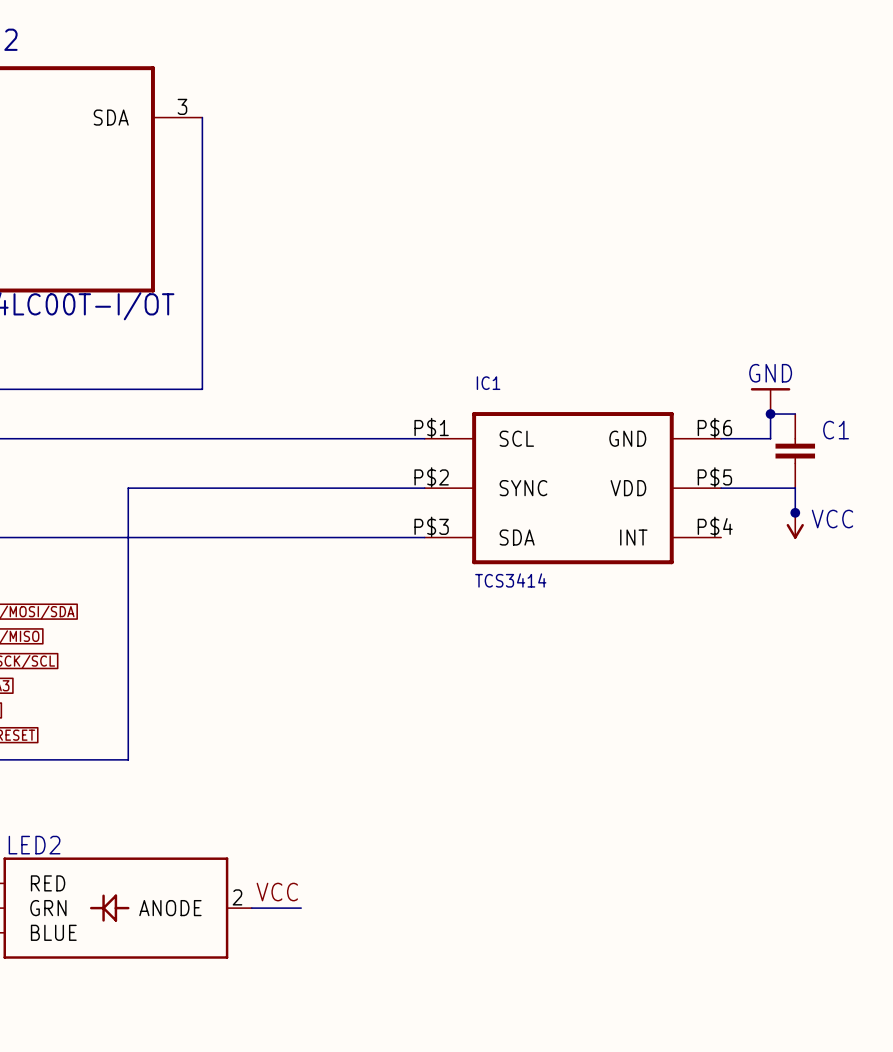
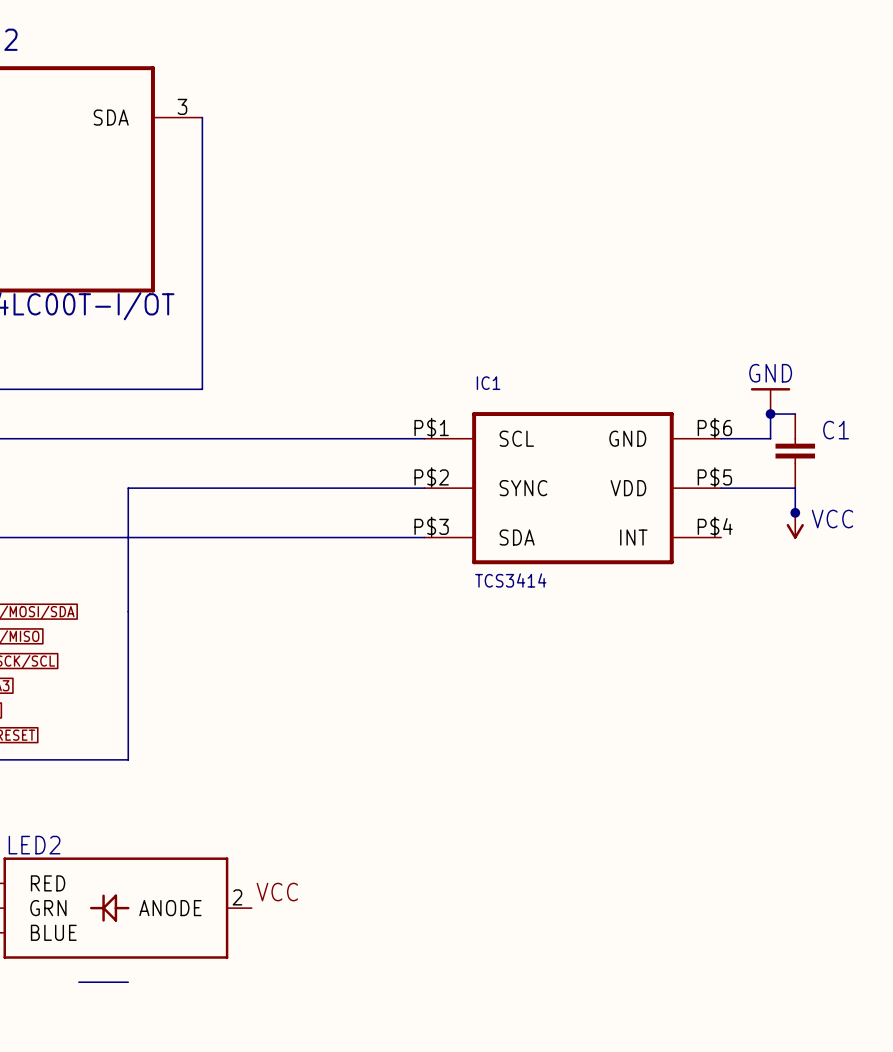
wire: (251, 908) (301, 908) -> (78, 982) (128, 982)

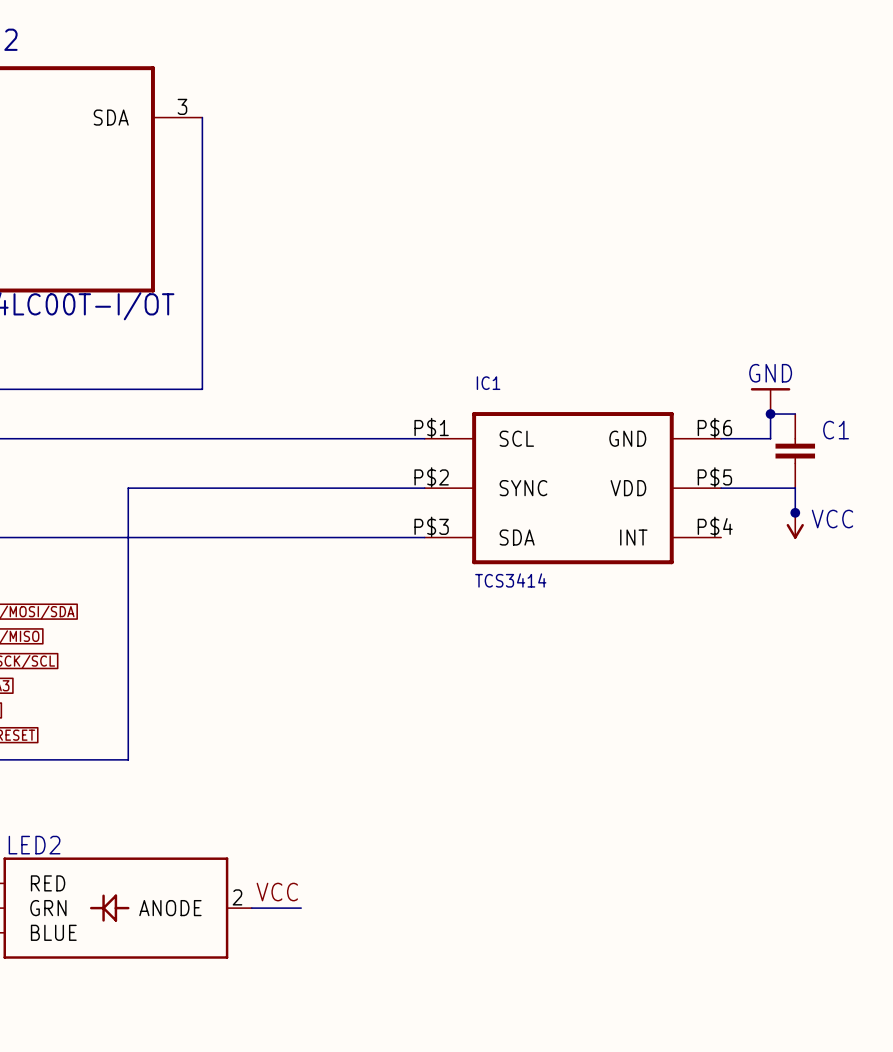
wire: (78, 982) (128, 982) -> (251, 908) (301, 908)

